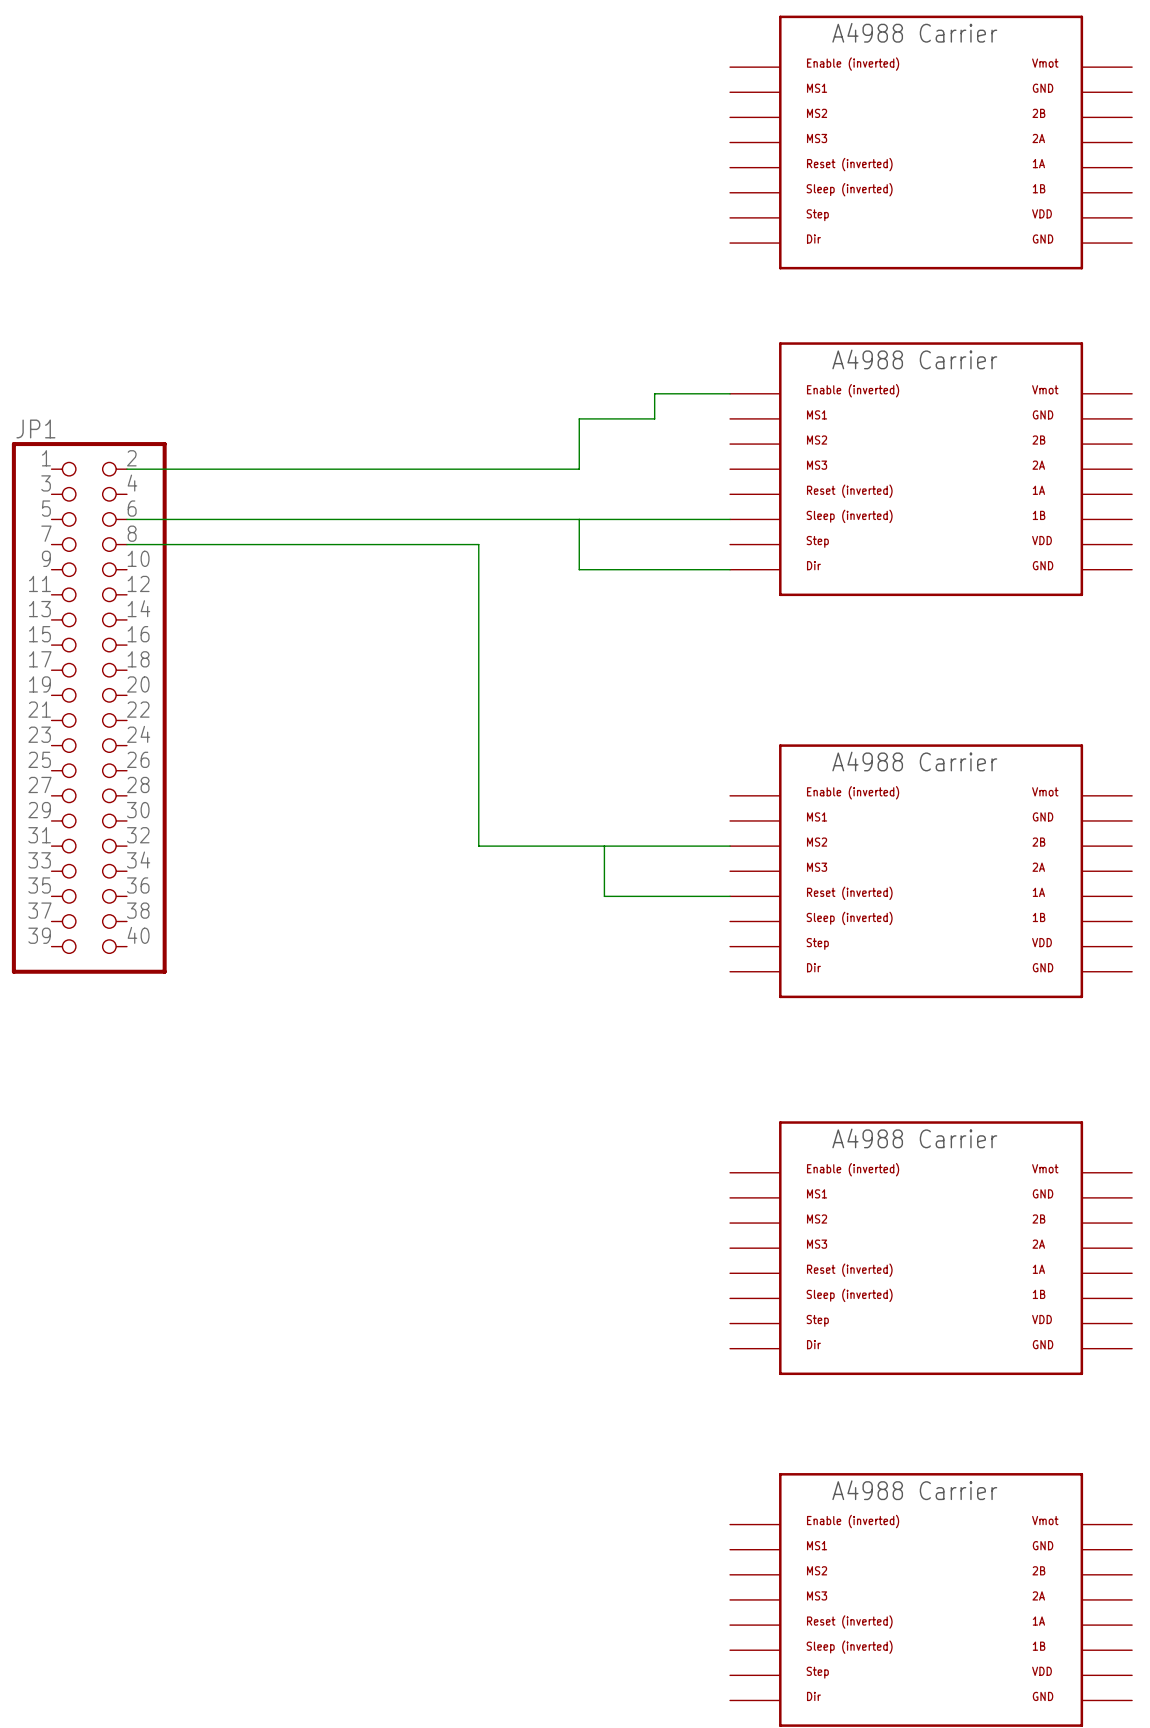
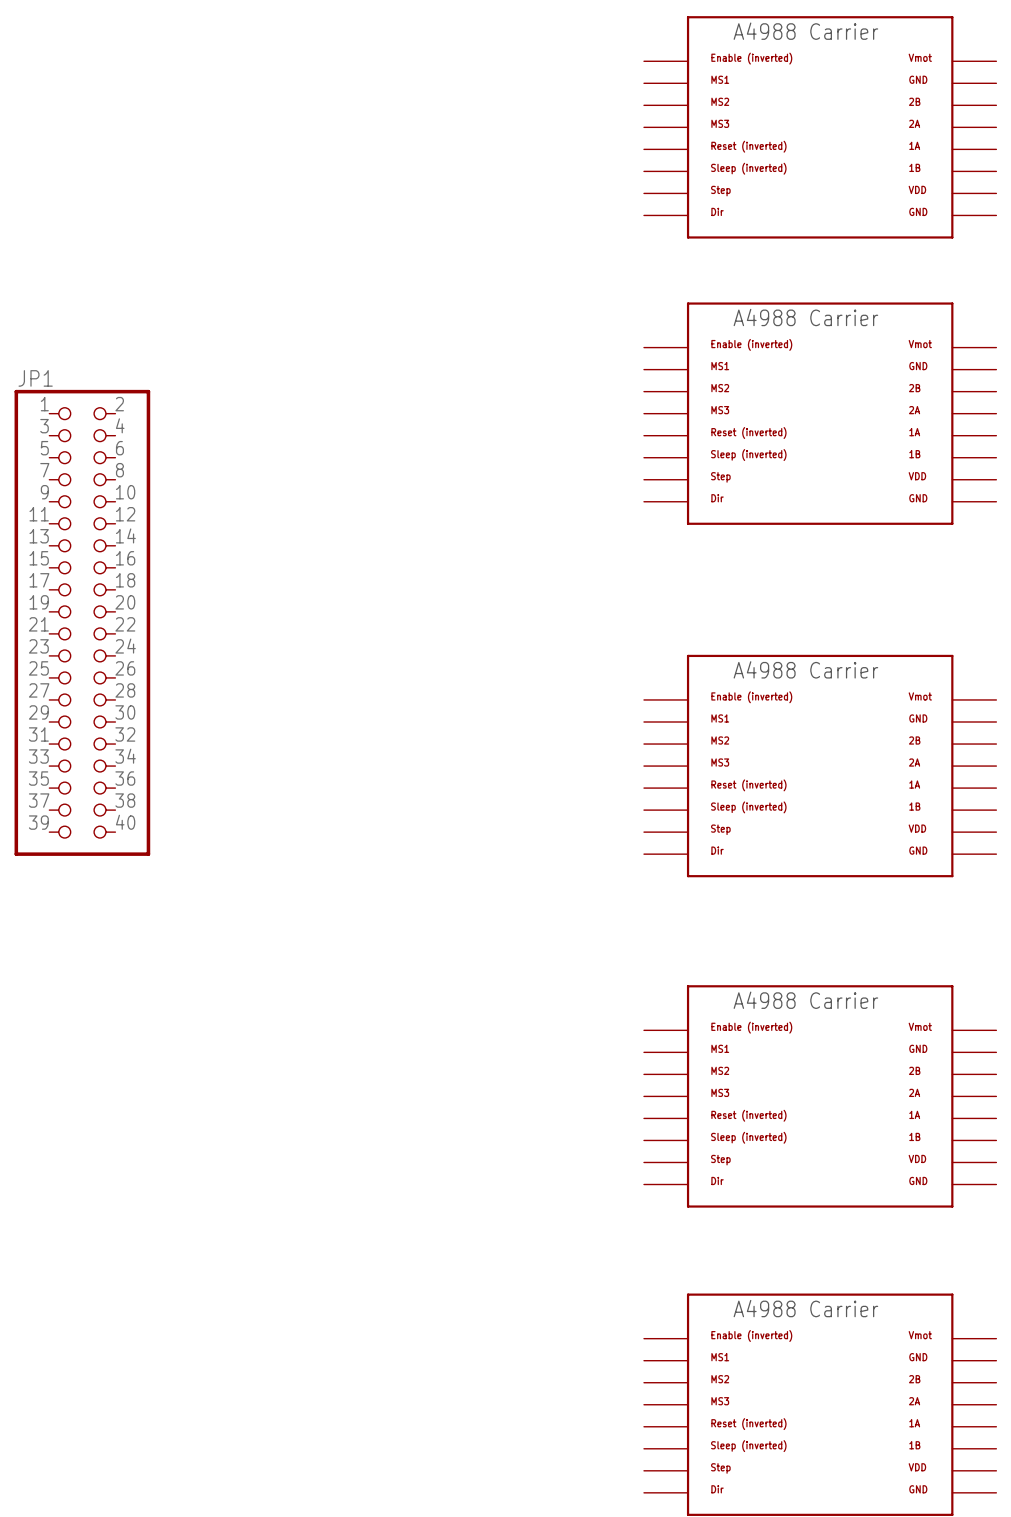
wire: (730, 393) (654, 393) (654, 418) (579, 418) (579, 469) (126, 469) -> none
wire: (126, 519) (730, 519) -> none
wire: (579, 519) (579, 569) (730, 569) -> none
wire: (126, 544) (478, 544) (478, 846) (730, 846) -> none
wire: (604, 846) (604, 896) (730, 896) -> none

